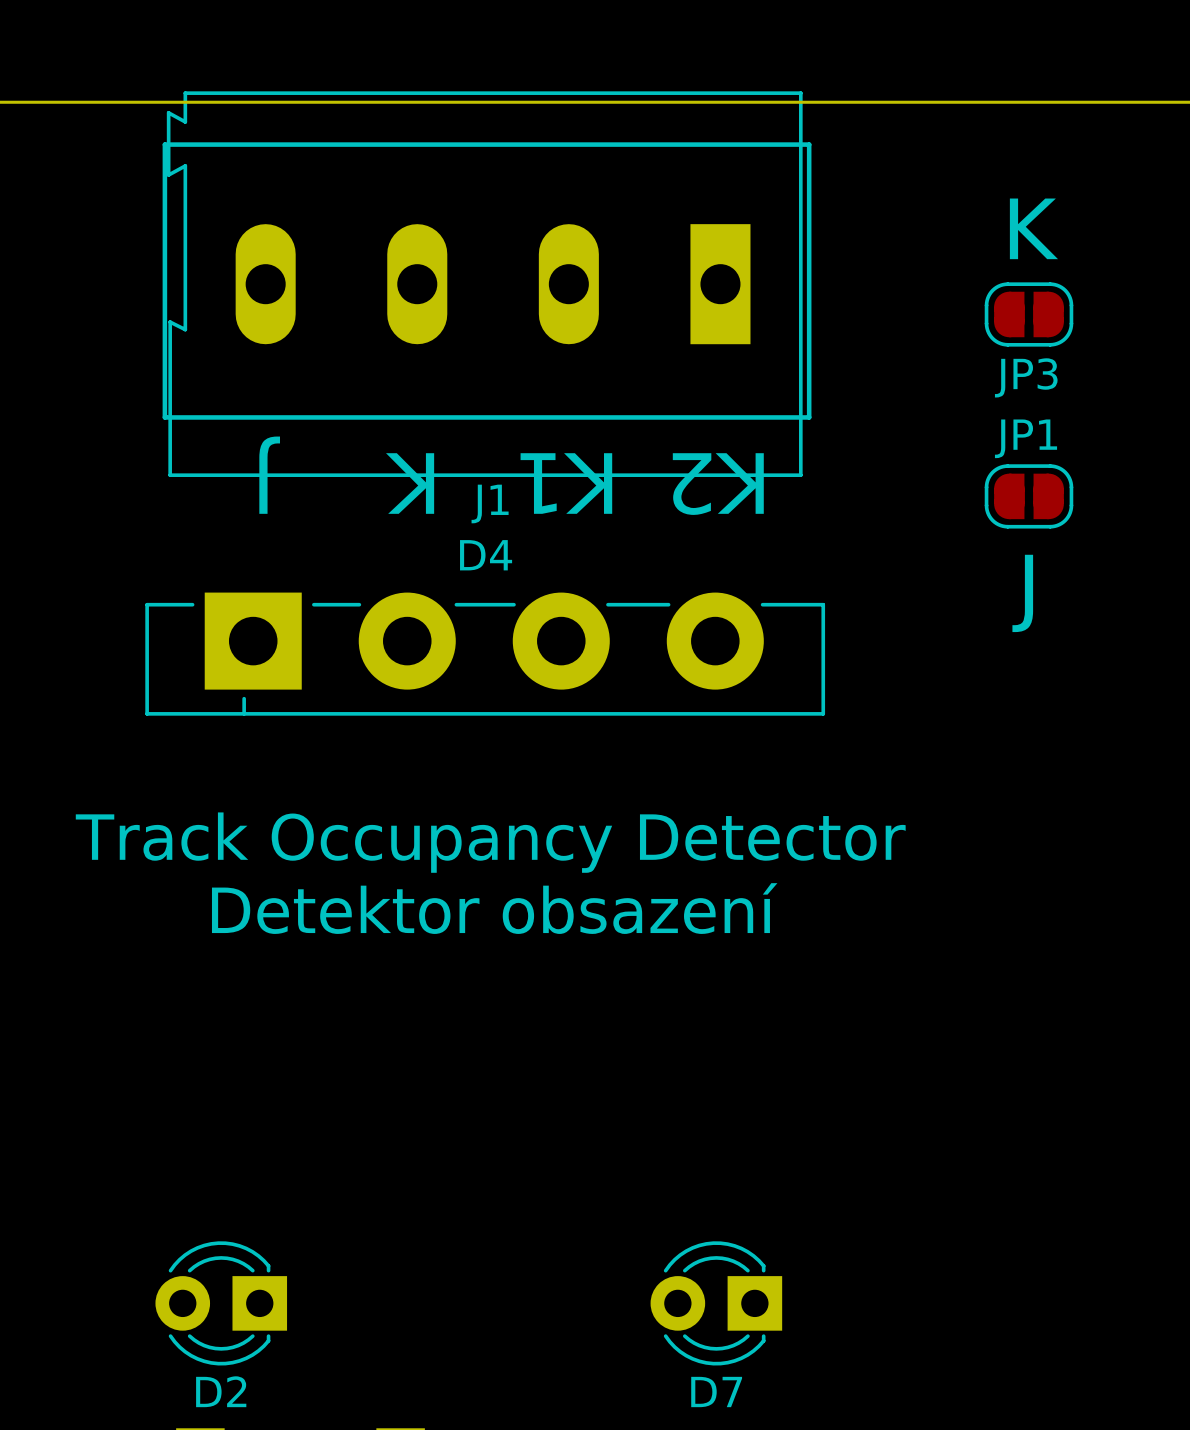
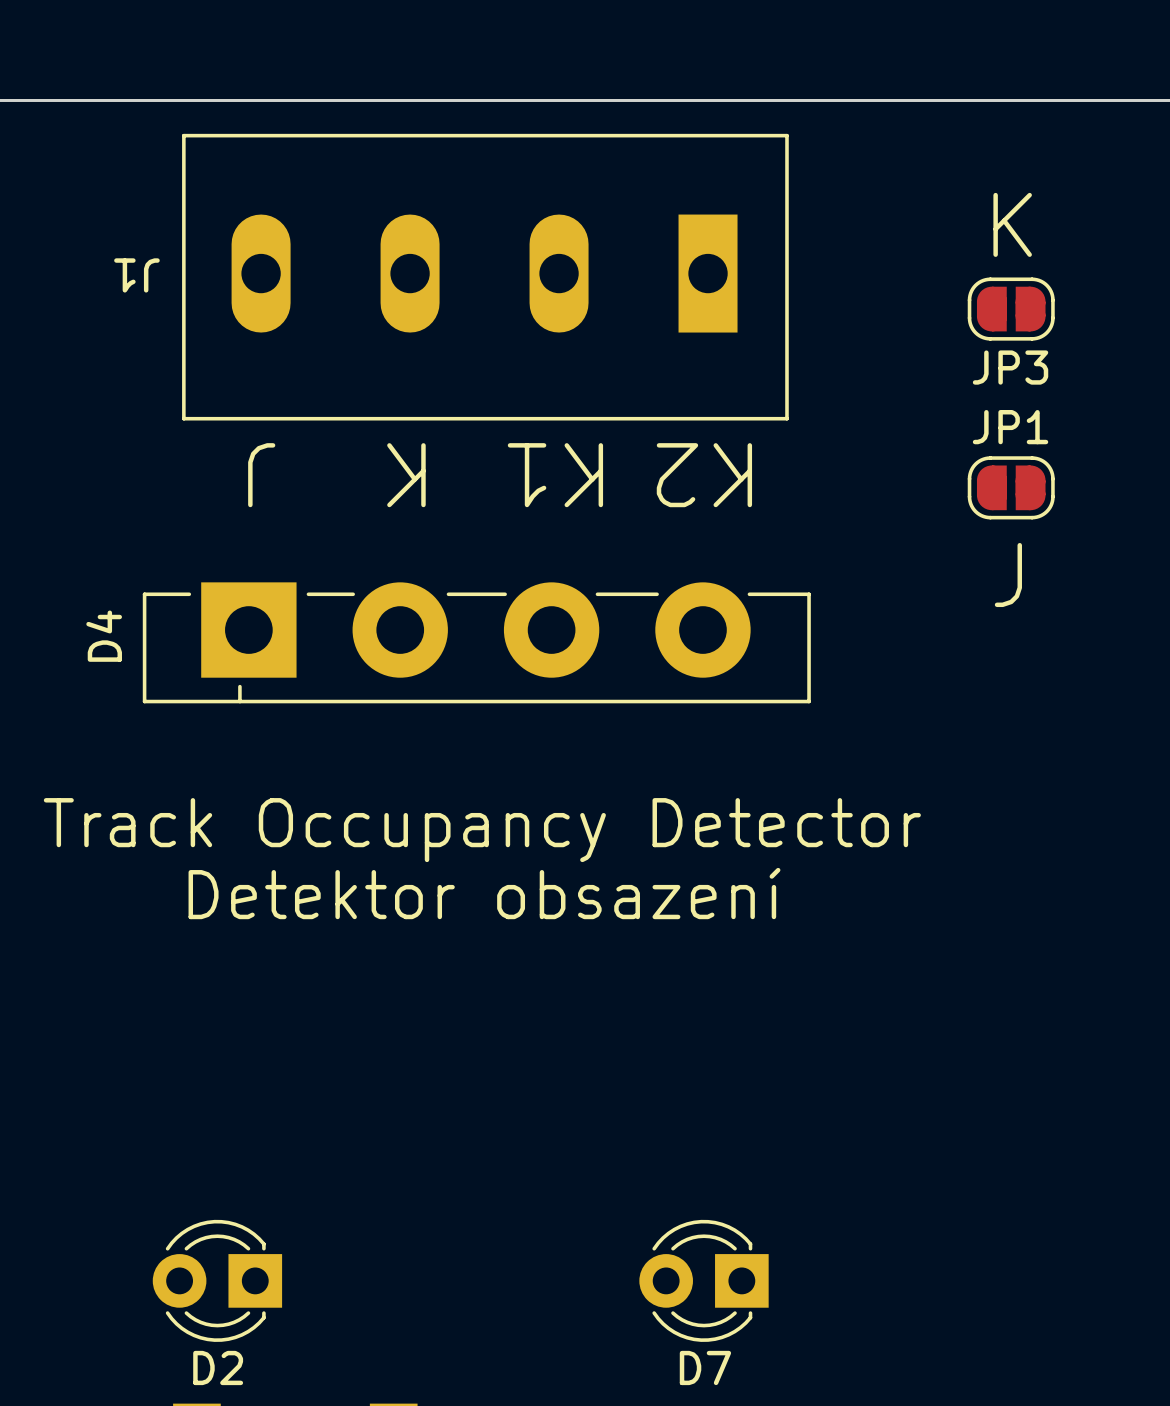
J1 footprint: [166, 91, 803, 478] -> [182, 133, 789, 421]
line: (164, 144) (164, 417) (809, 417) (809, 144) (164, 144) -> none
J1 name position: J1 (490, 503) -> J1 (136, 275)
D4 name rotation: 0° (486, 555) -> 90° counterclockwise (104, 636)
D4 name position: D4 (486, 555) -> D4 (104, 636)

